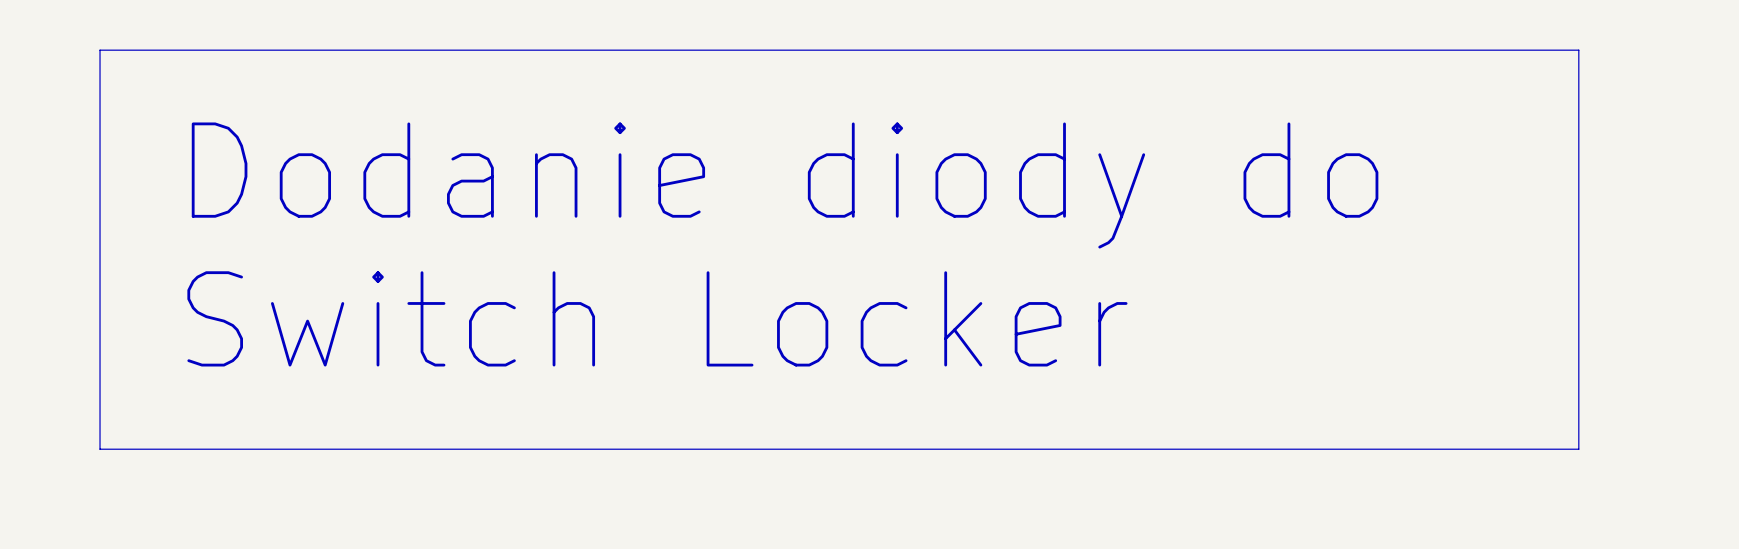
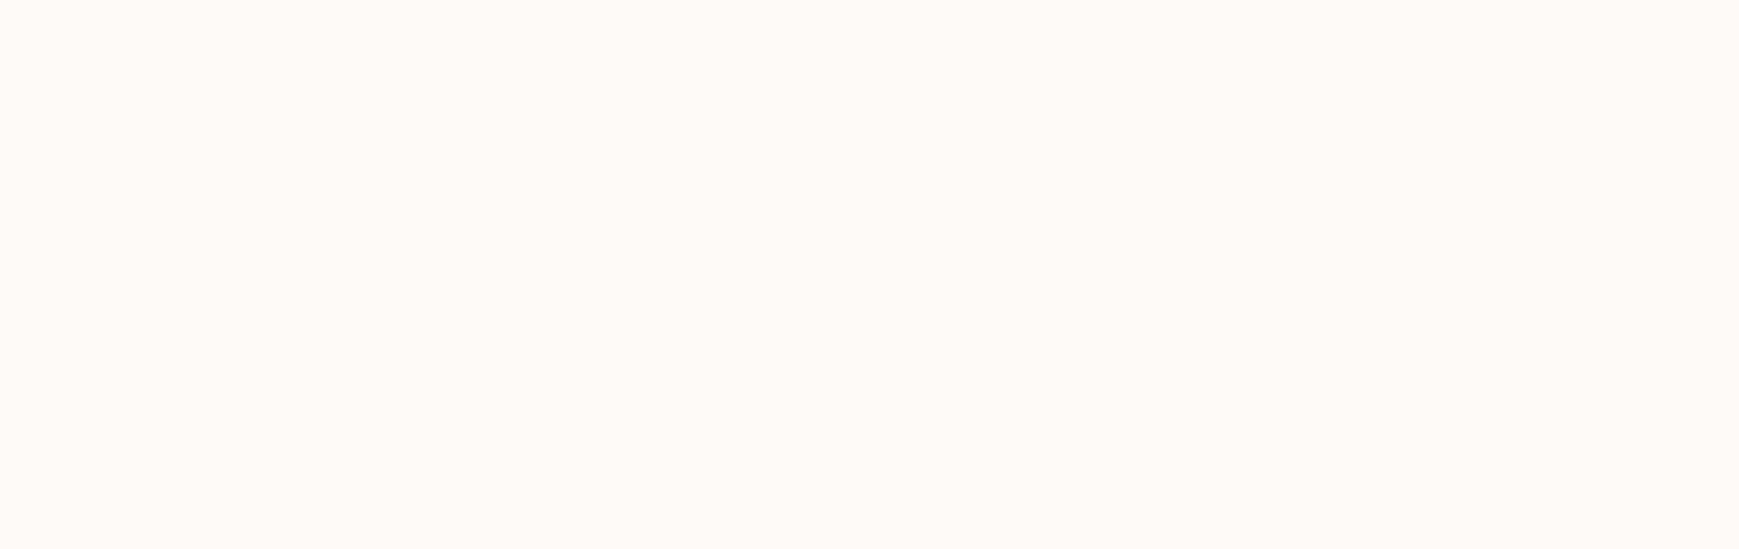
line: (100, 50) (1578, 50) (1578, 449) (100, 449) (100, 50) -> none
text: Dodanie diody do (785, 185) -> none
text: Switch Locker (657, 318) -> none

